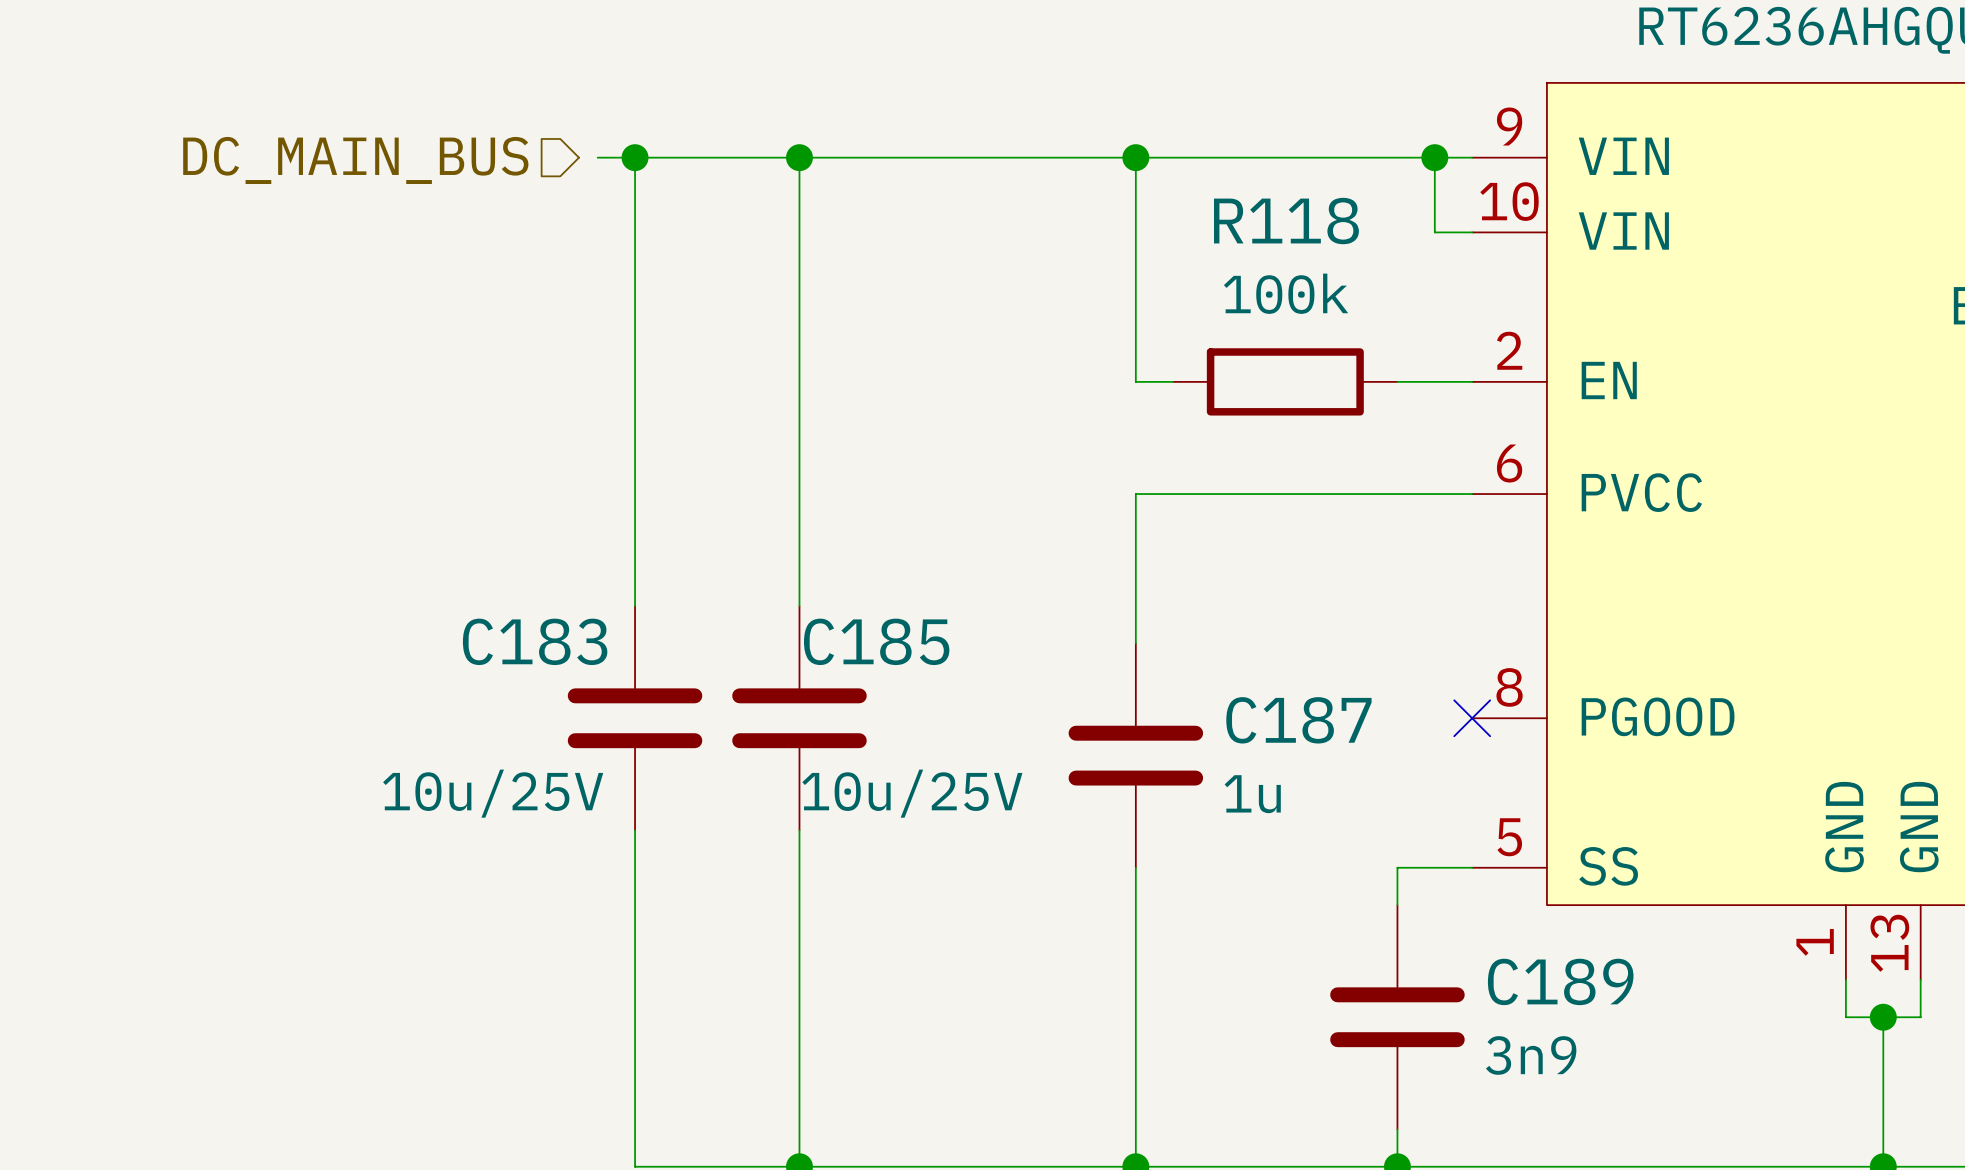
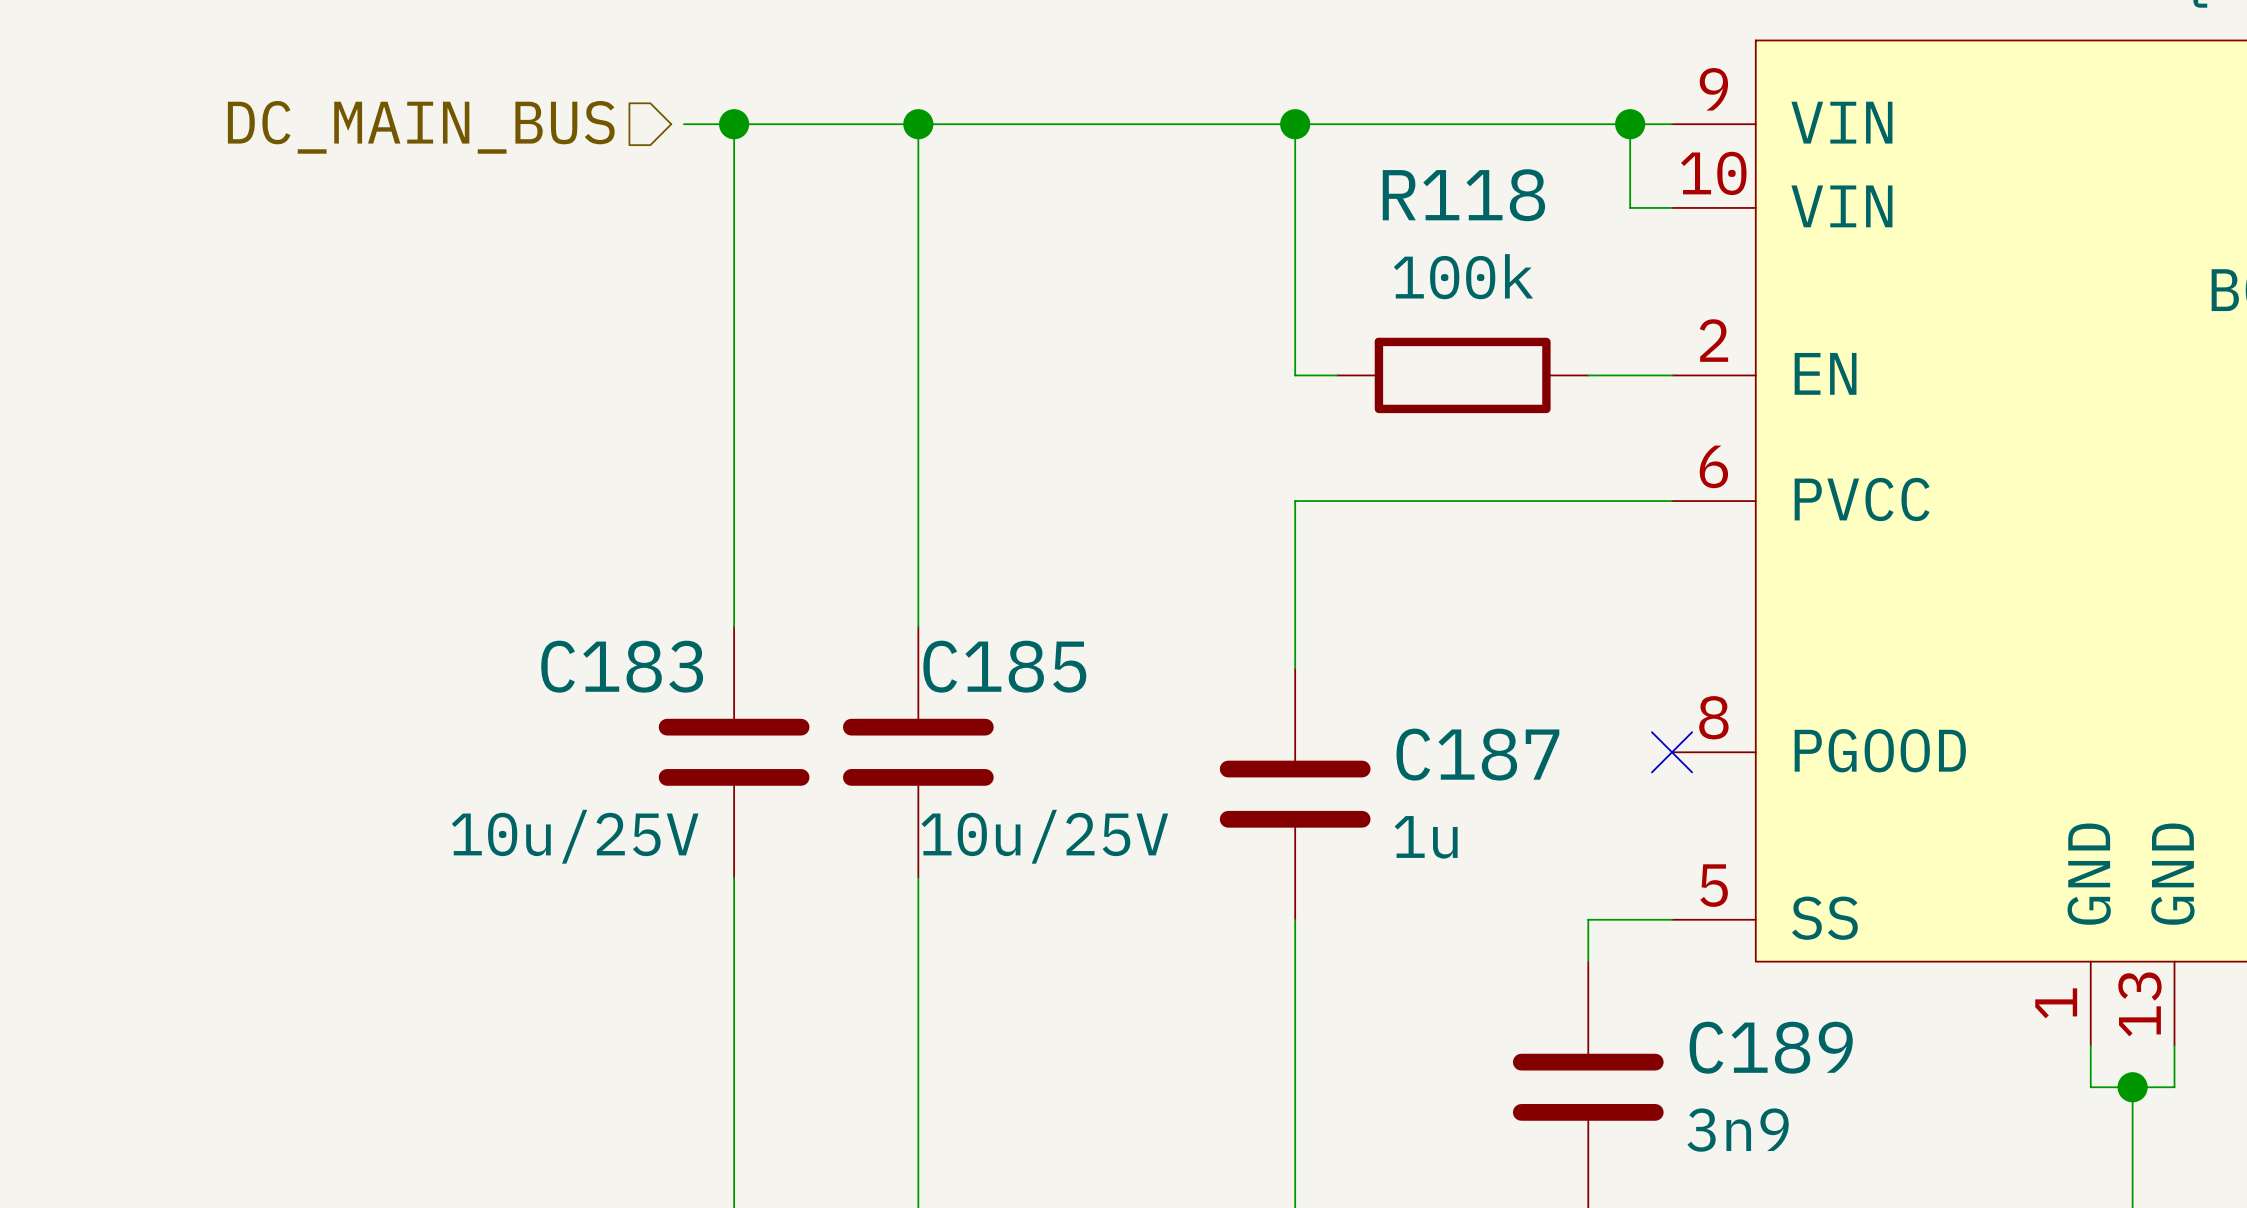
wire: none -> (683, 124) (692, 124)

